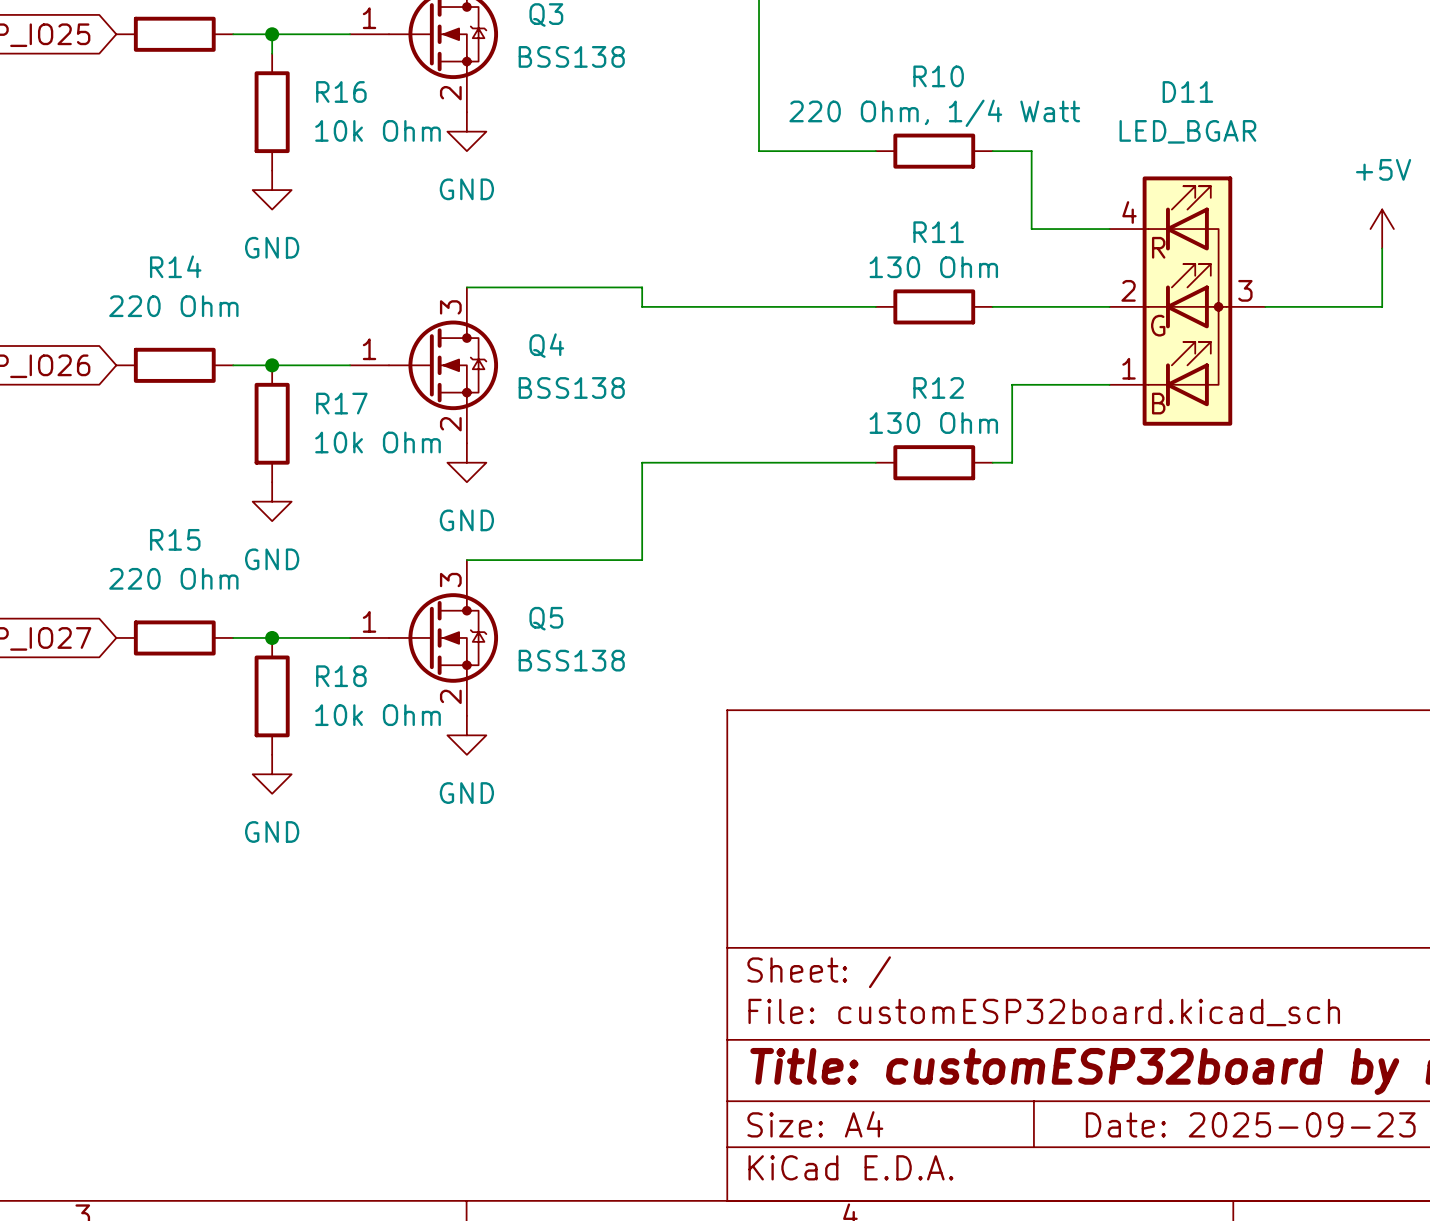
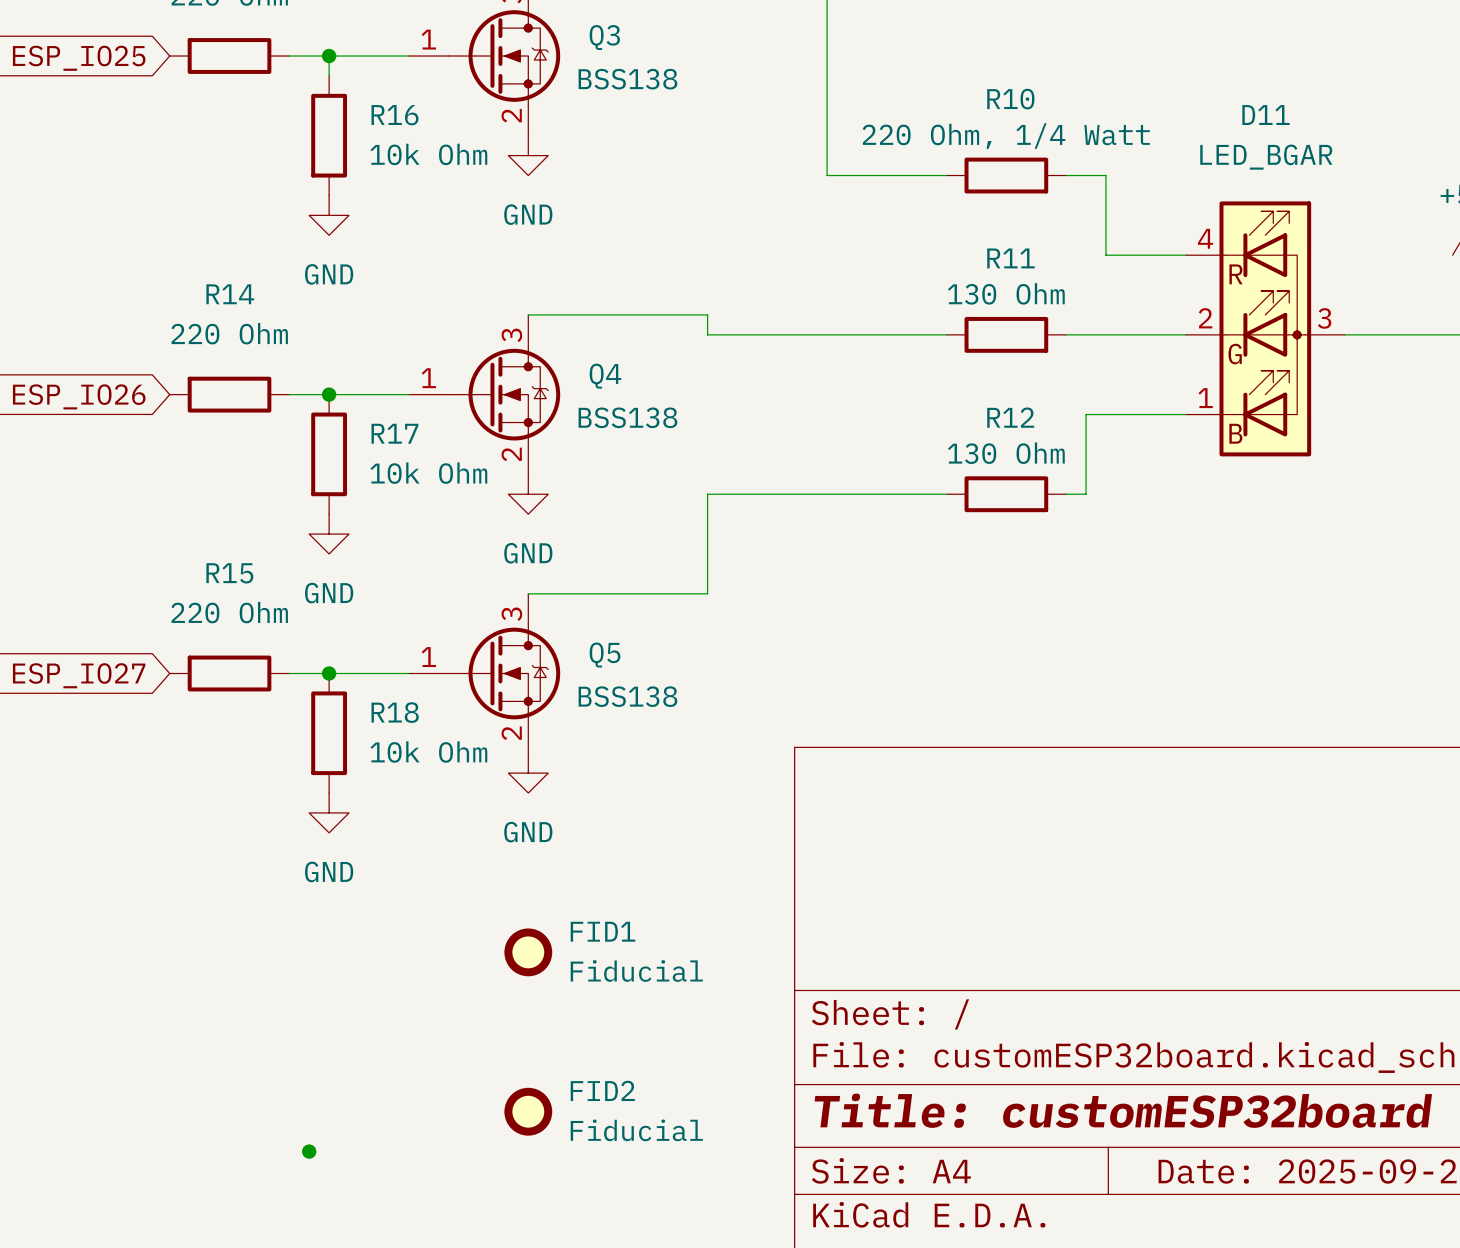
FID1: none -> Fiducial (528, 952)
FID2: none -> Fiducial (528, 1111)
junction: none -> (309, 1151)

